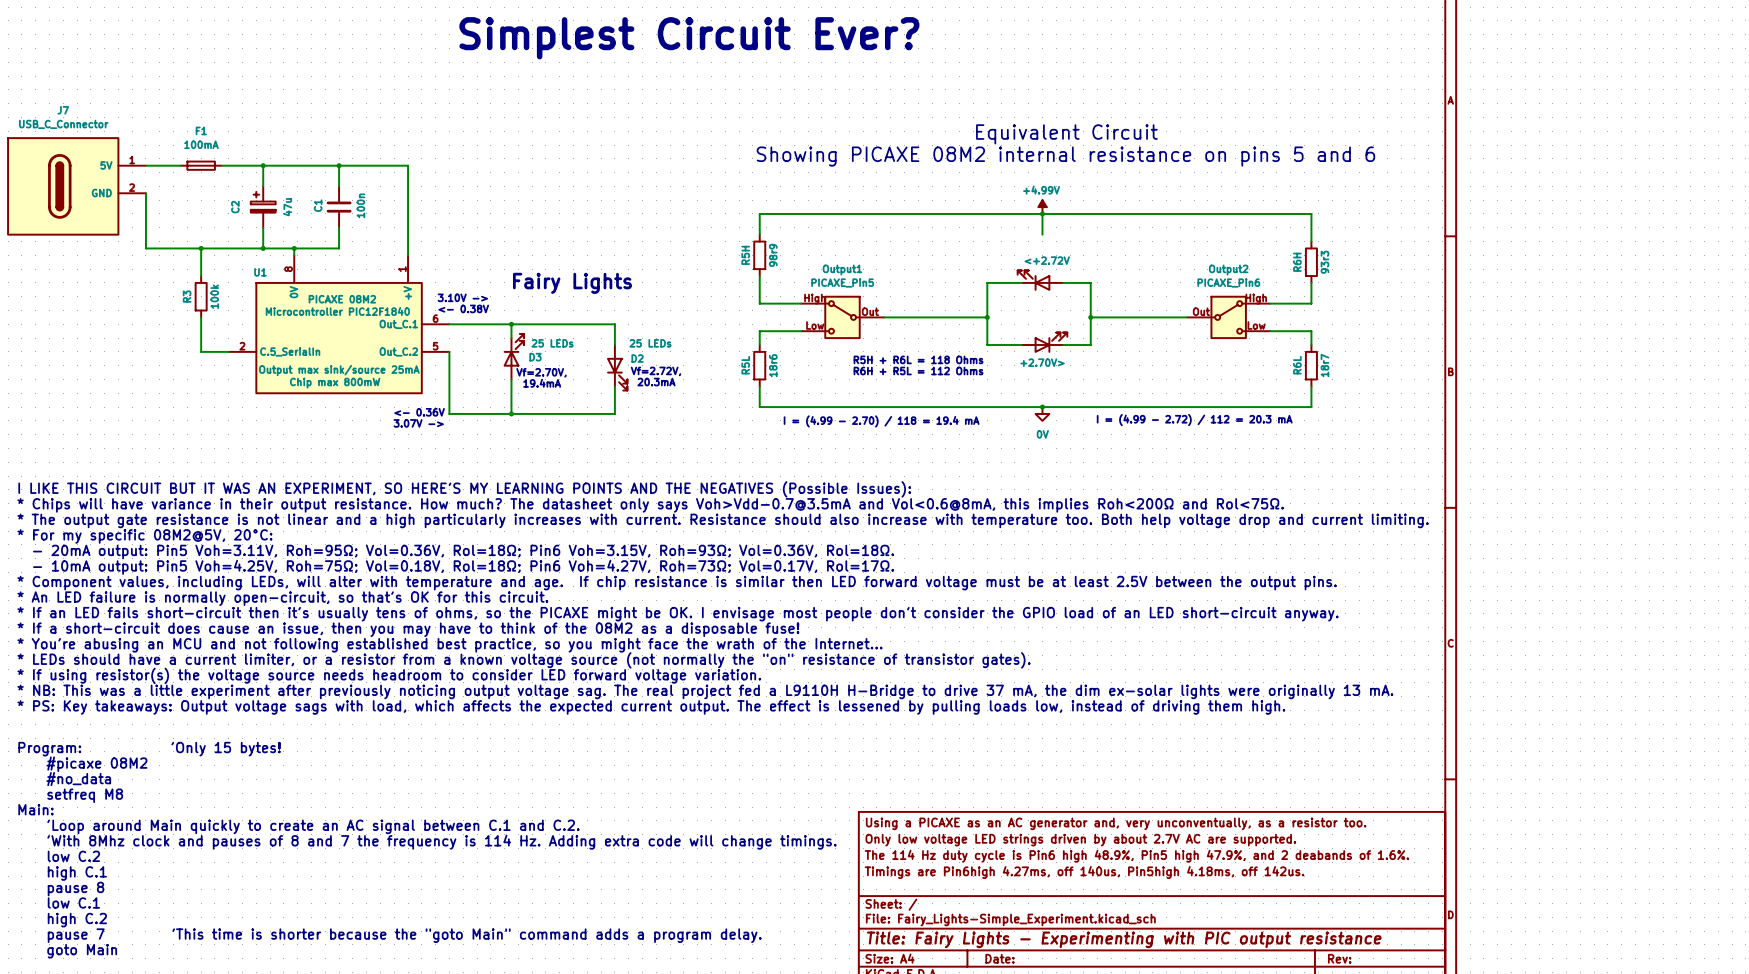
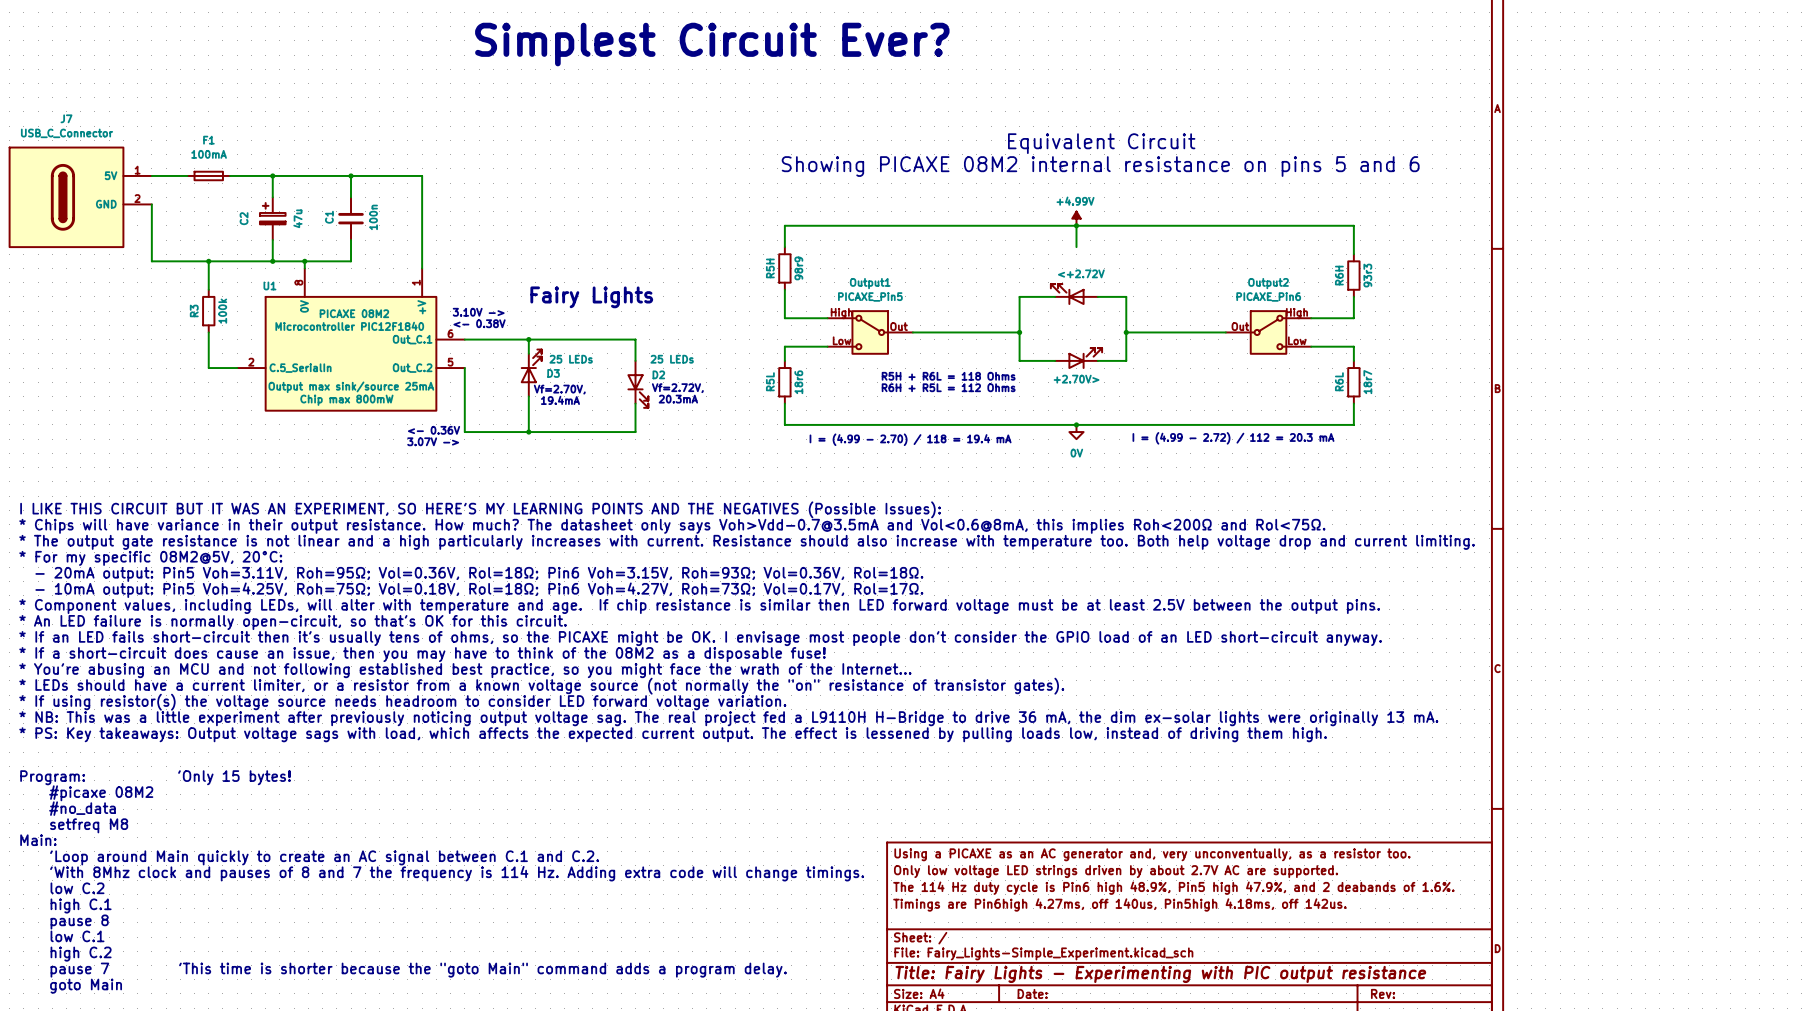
text: * NB: This was a little experiment after previously noticing output voltage sag. The real project fed a L9110H H-Bridge to drive 37 mA, the dim ex-solar lights were originally 13 mA. (705, 691) -> * NB: This was a little experiment after previously noticing output voltage sag. The real project fed a L9110H H-Bridge to drive 36 mA, the dim ex-solar lights were originally 13 mA. (728, 718)

